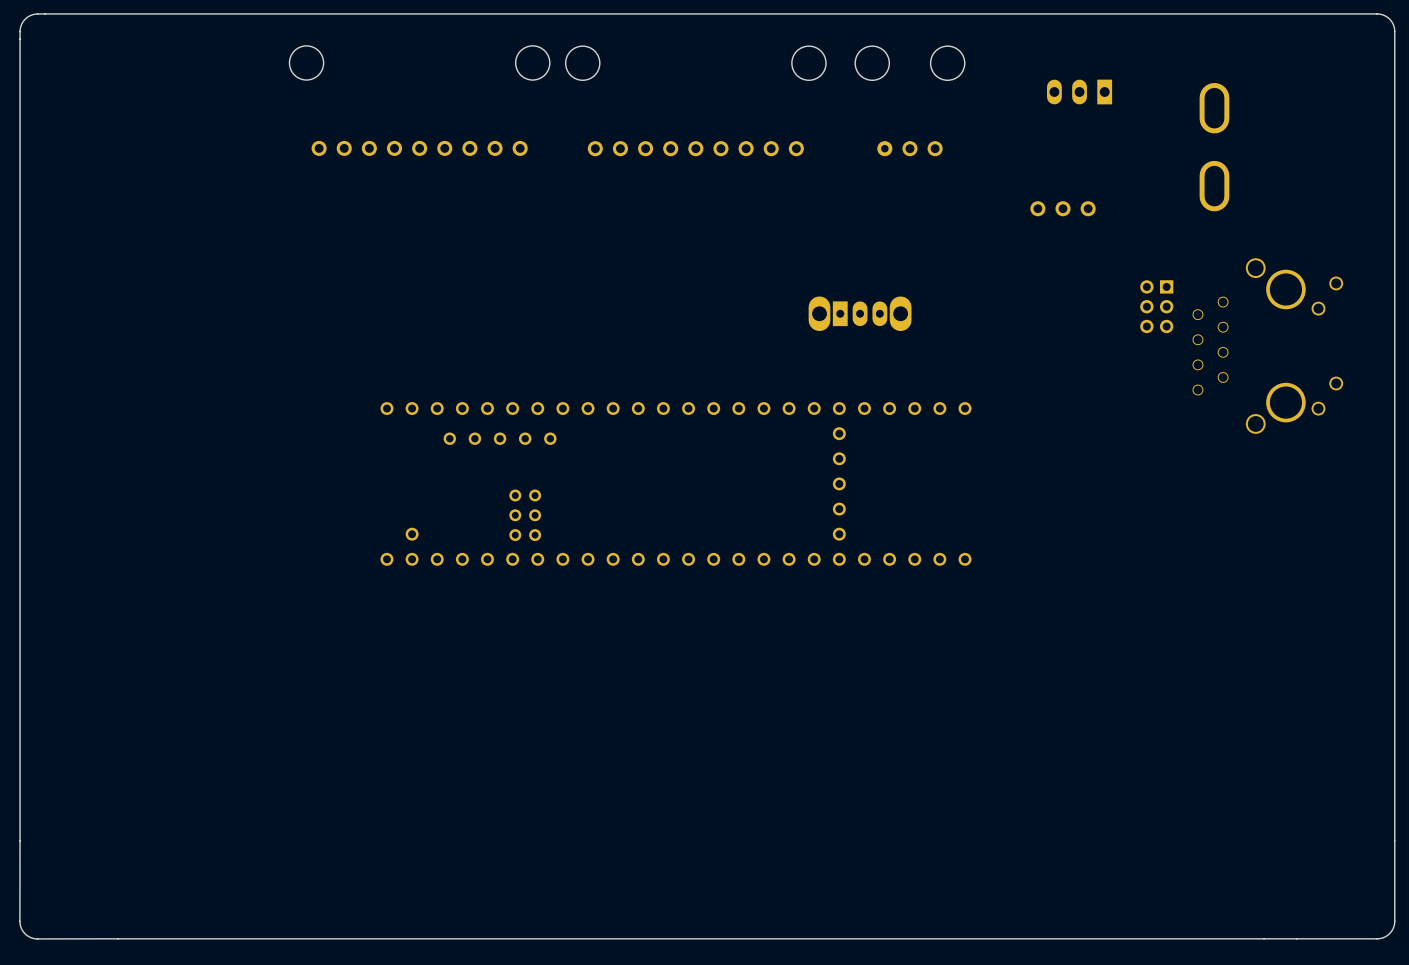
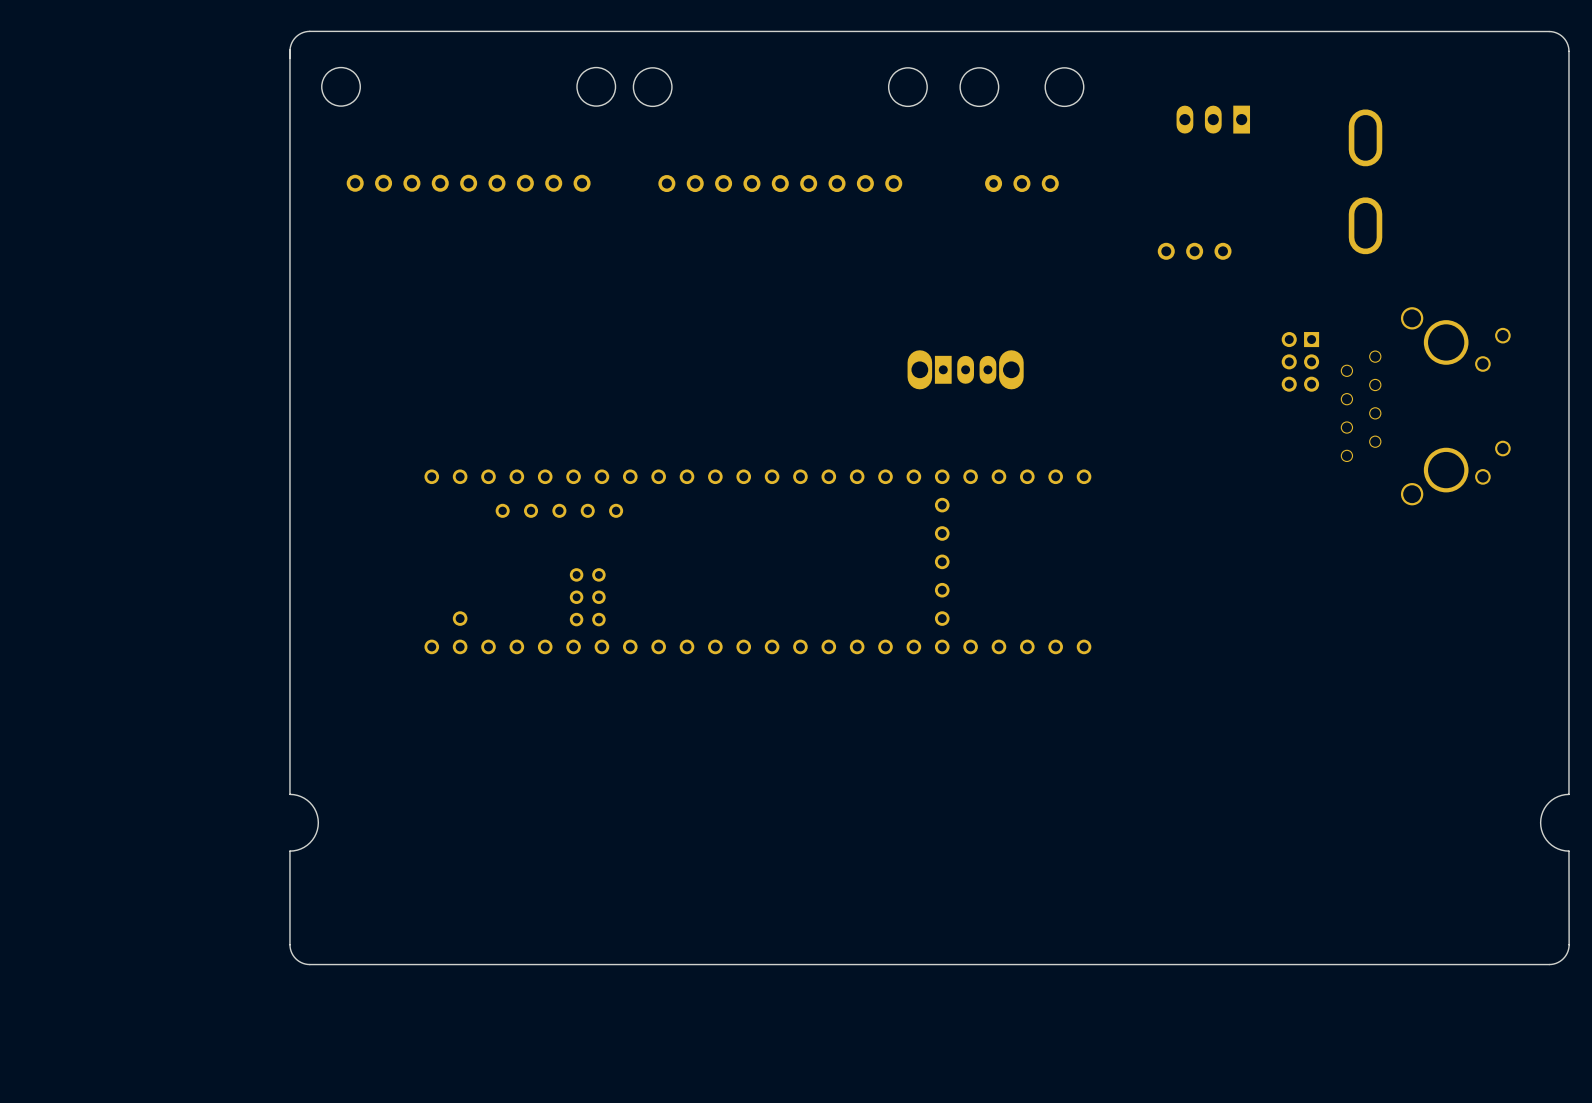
board edge: (1377, 13) (45, 13) (28, 16) (22, 22) (20, 31) (20, 925) (26, 935) (37, 938) (1381, 938) (1390, 932) (1394, 921) (1394, 690) -> (1549, 31) (309, 31) (297, 35) (291, 42) (289, 51) (289, 794) (300, 796) (310, 802) (316, 811) (318, 822) (316, 833) (310, 842) (300, 848) (289, 851) (290, 946) (295, 958) (309, 964) (1551, 964) (1563, 958) (1569, 946) (1568, 851) (1558, 848) (1548, 842) (1541, 830) (1540, 819) (1548, 802) (1558, 796) (1568, 794)
board edge: none -> (289, 49) (289, 58)

